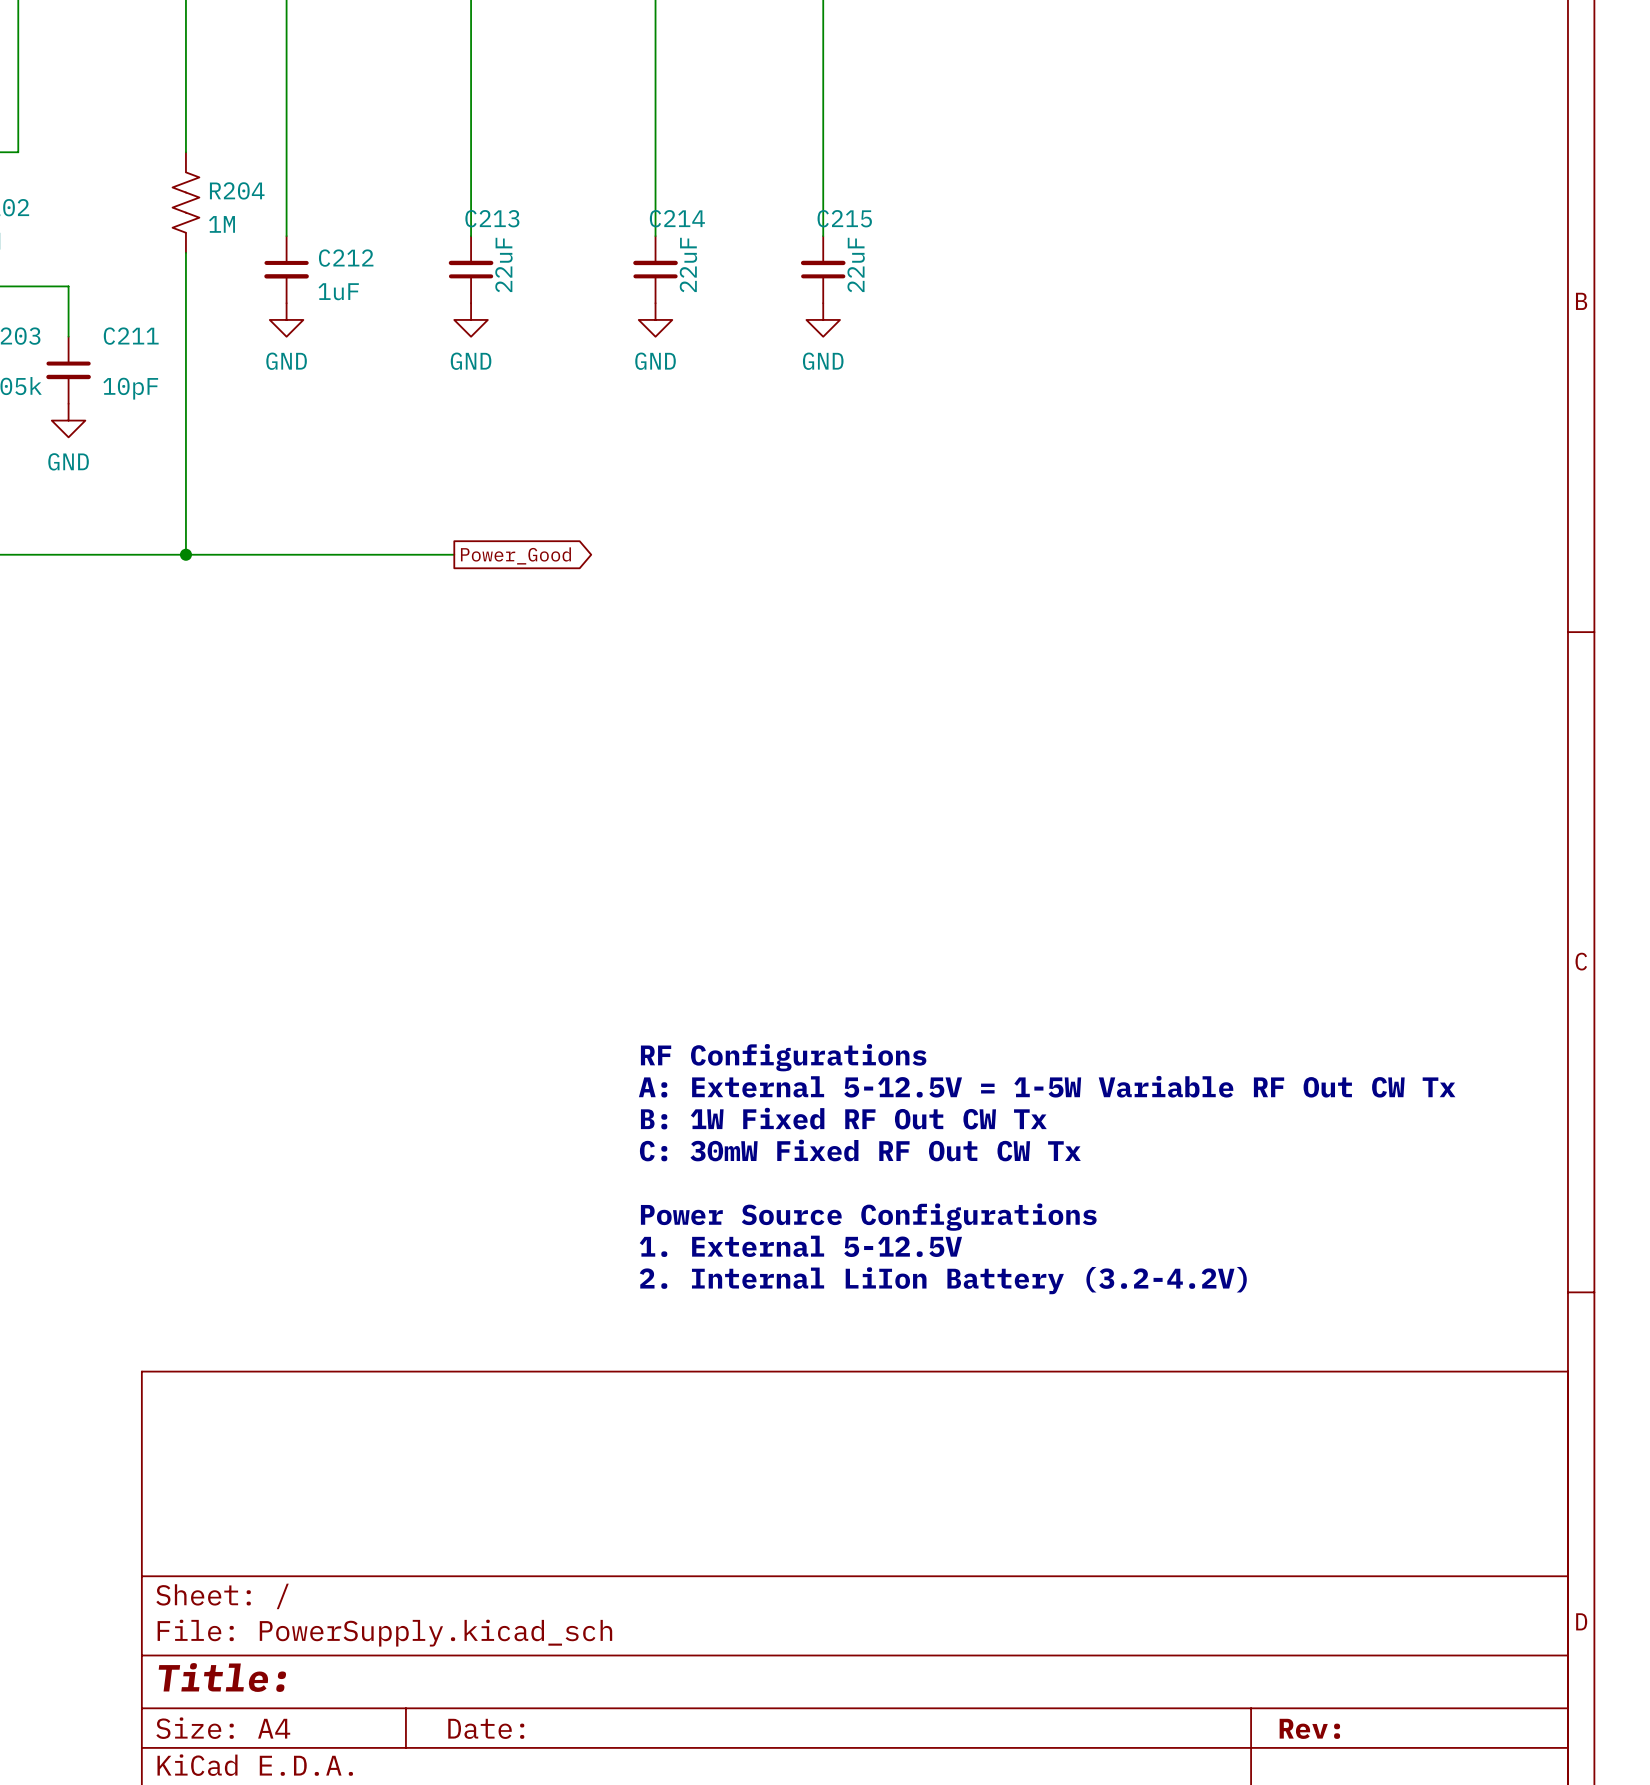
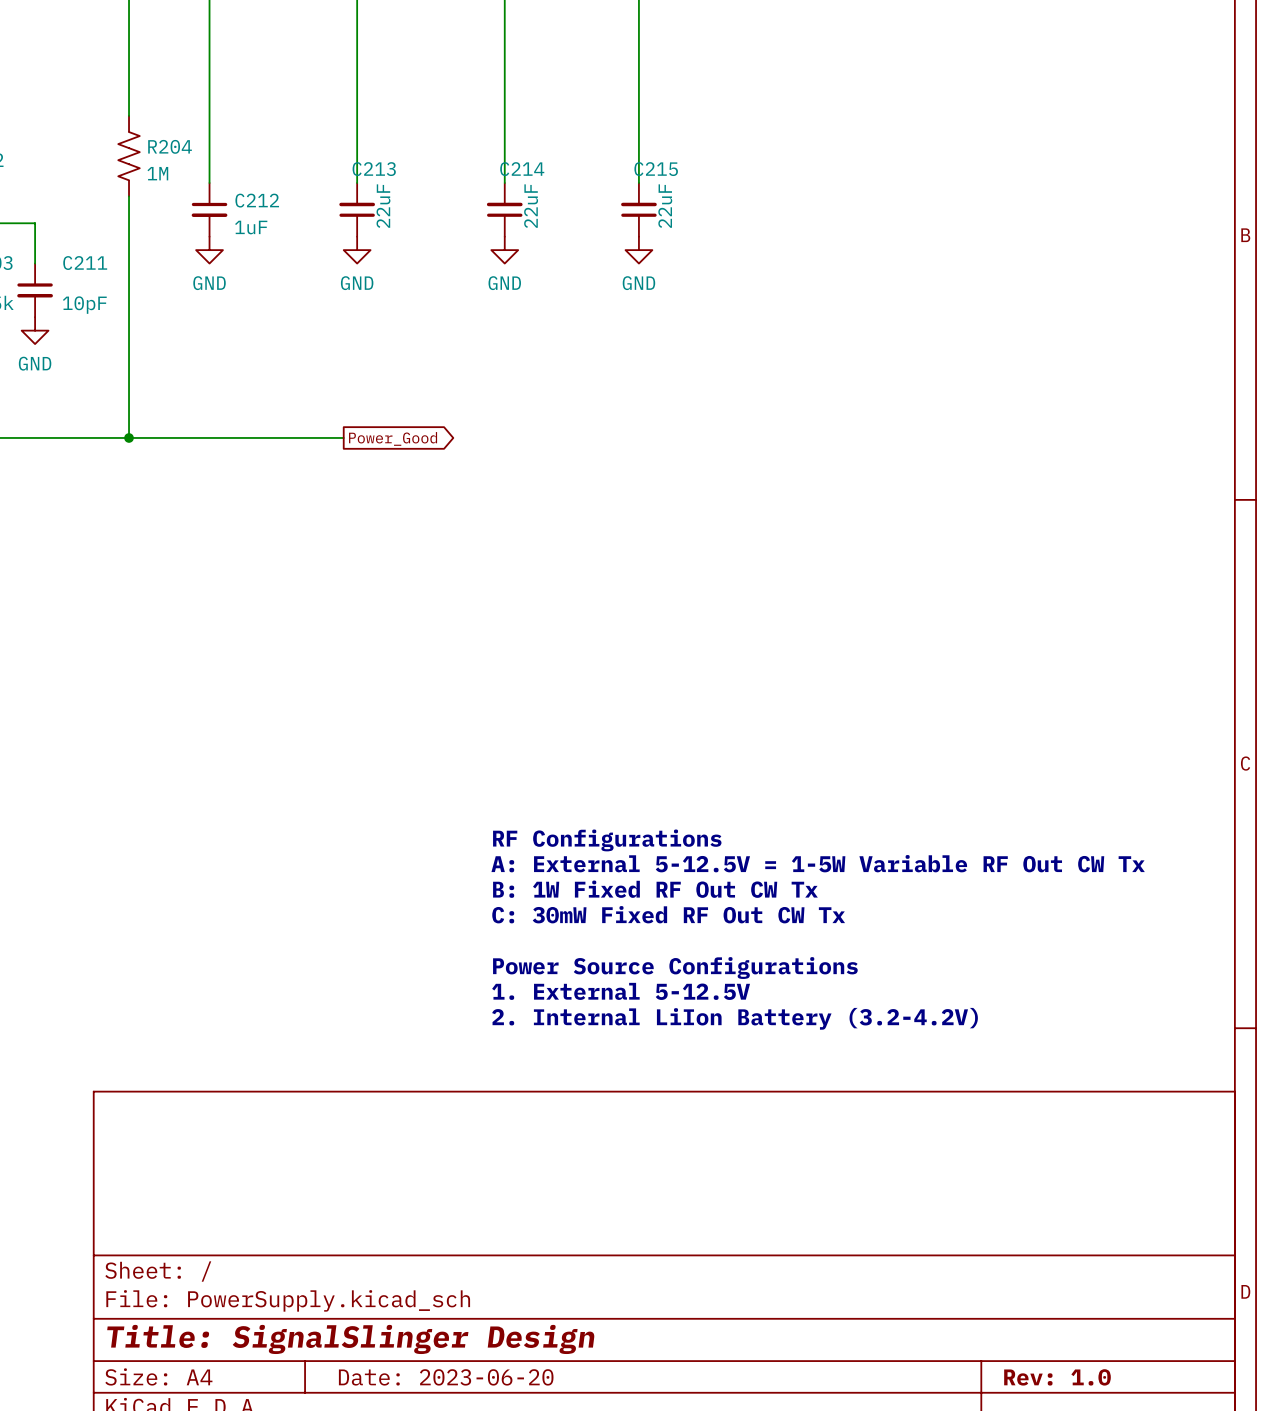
title block: Title: (222, 1677) -> Title: SignalSlinger Design (350, 1339)
title block: Date: (486, 1728) -> Date: 2023-06-20 (446, 1377)
title block: Rev: (1309, 1728) -> Rev: 1.0 (1057, 1377)

